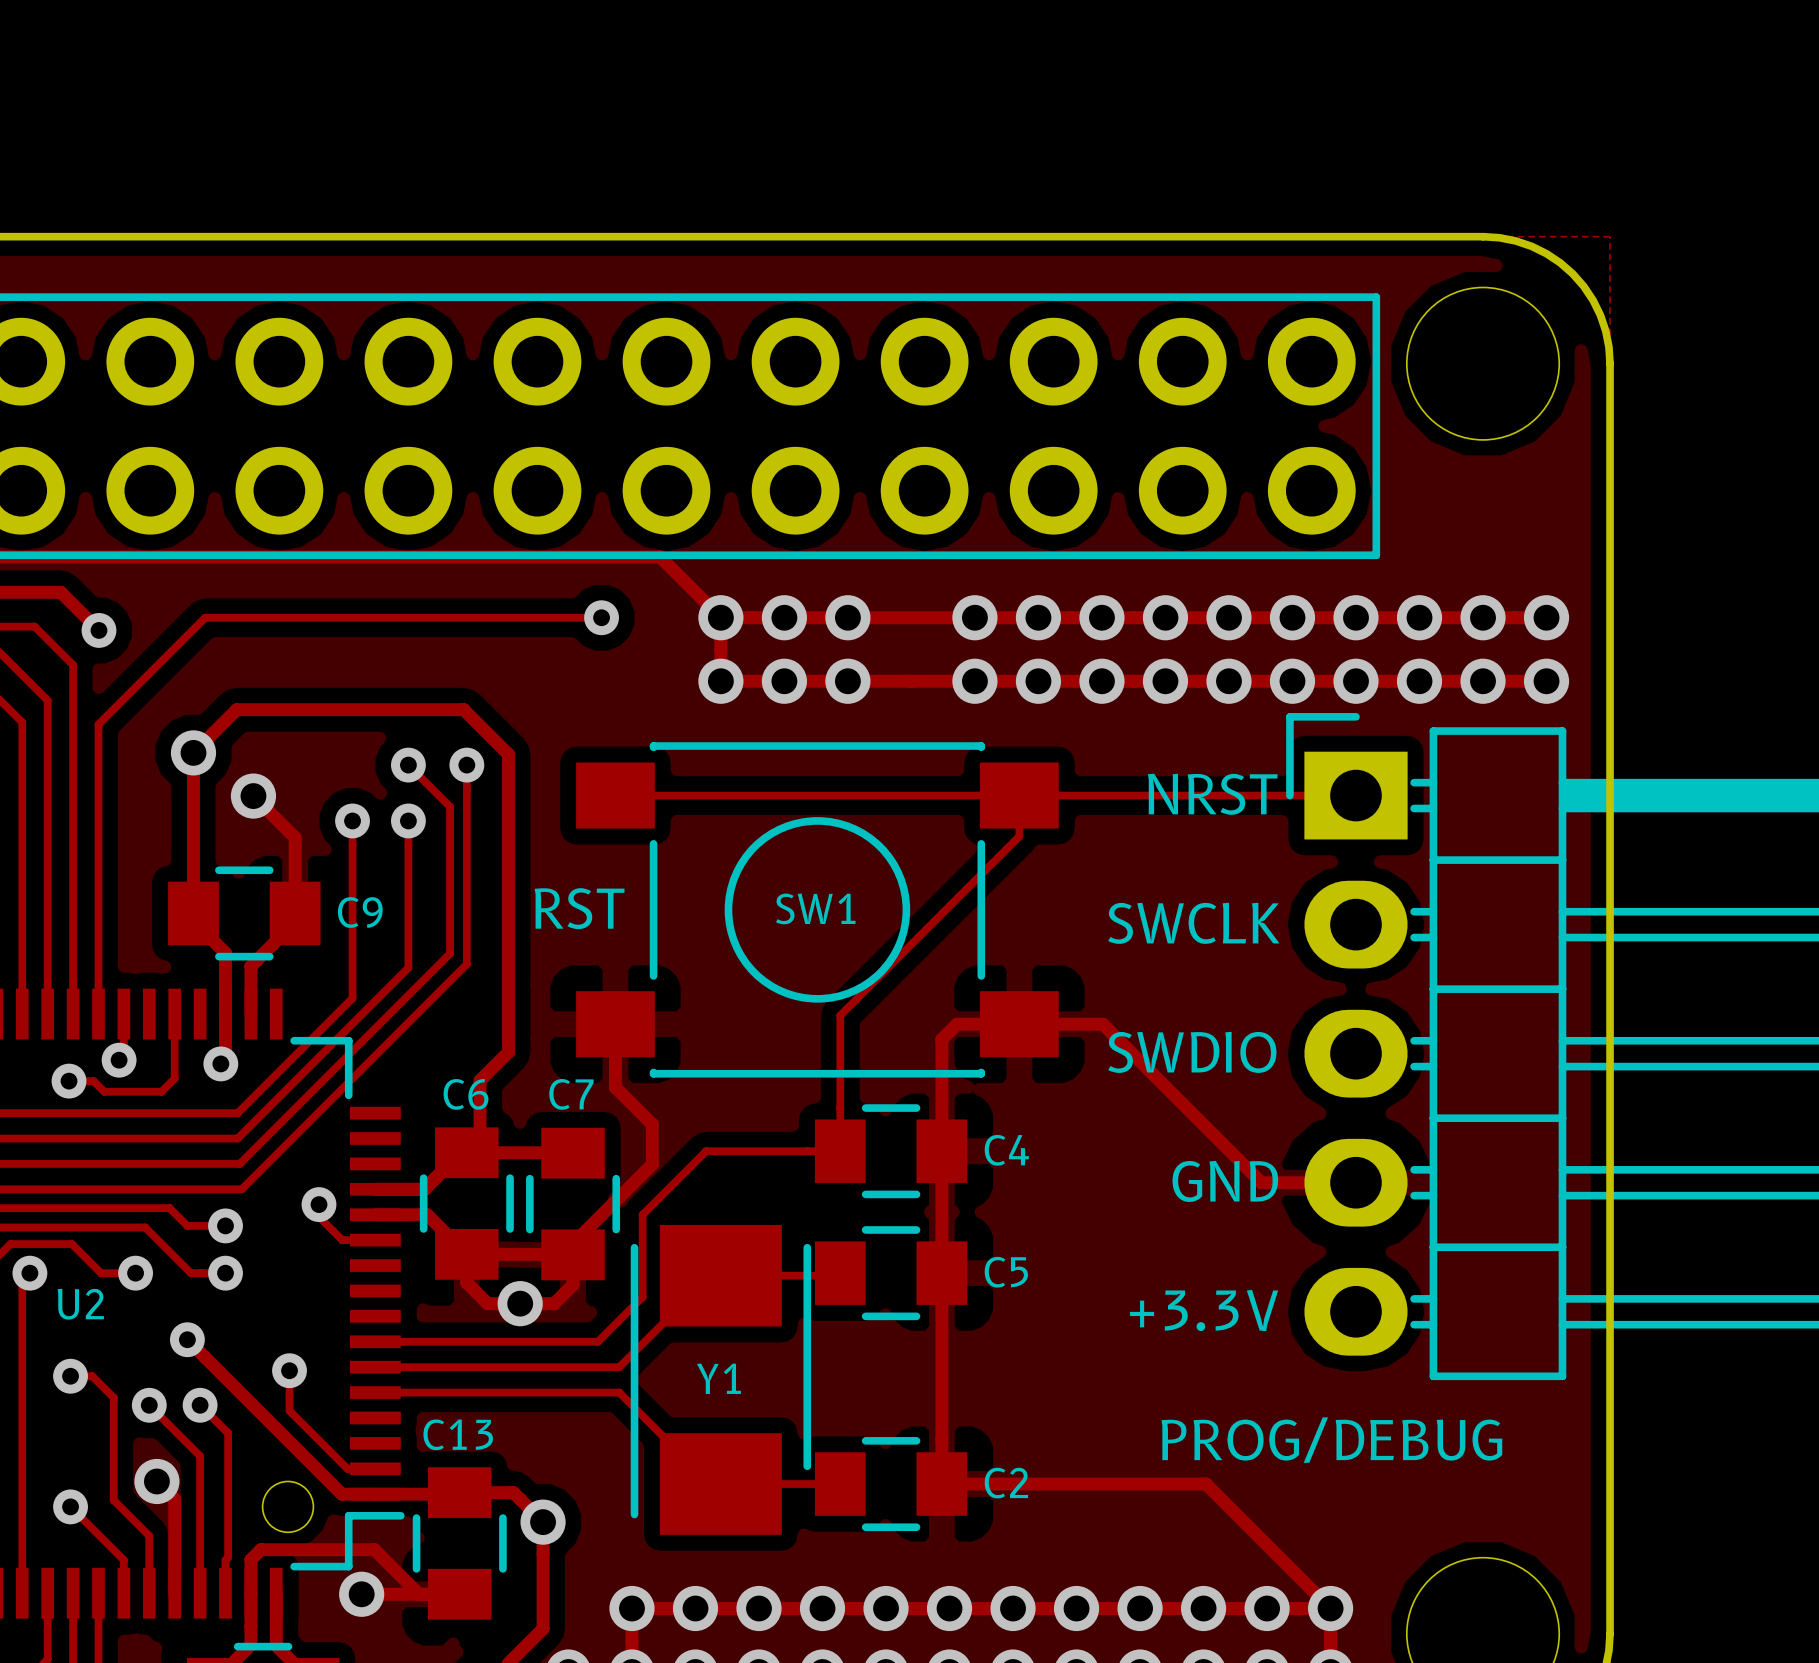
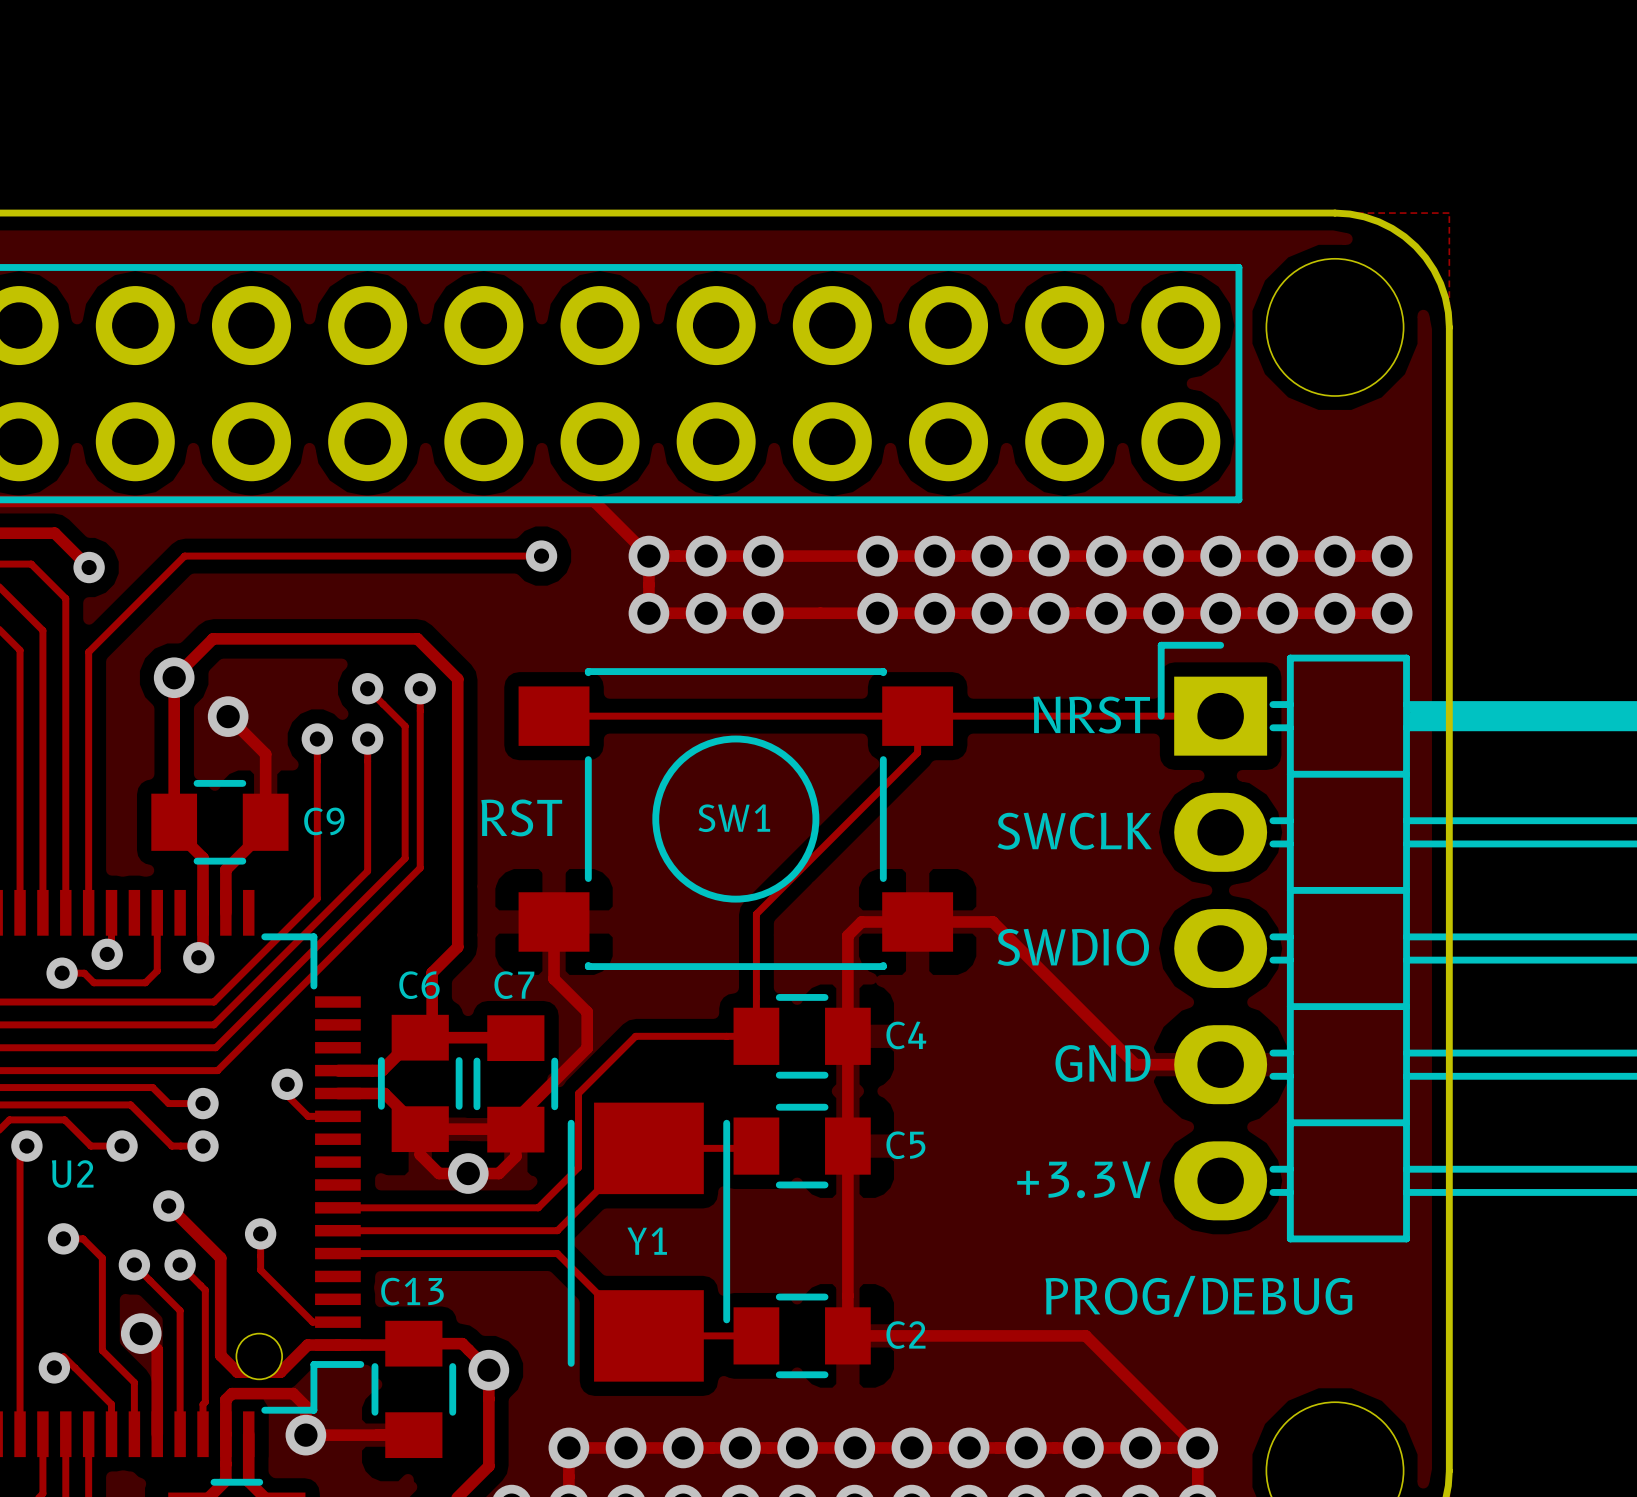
track: (245, 1397) (341, 1494) -> (220, 1258) (220, 1355) (237, 1372) (280, 1372) (307, 1345)
via position: (70, 1506) -> (54, 1367)
track: (250, 1559) (260, 1549) (374, 1549) (419, 1594) -> (225, 1404) (225, 1399) (231, 1393) (293, 1393) (305, 1406) (305, 1435) (325, 1435)
via position: (361, 1594) -> (305, 1435)

